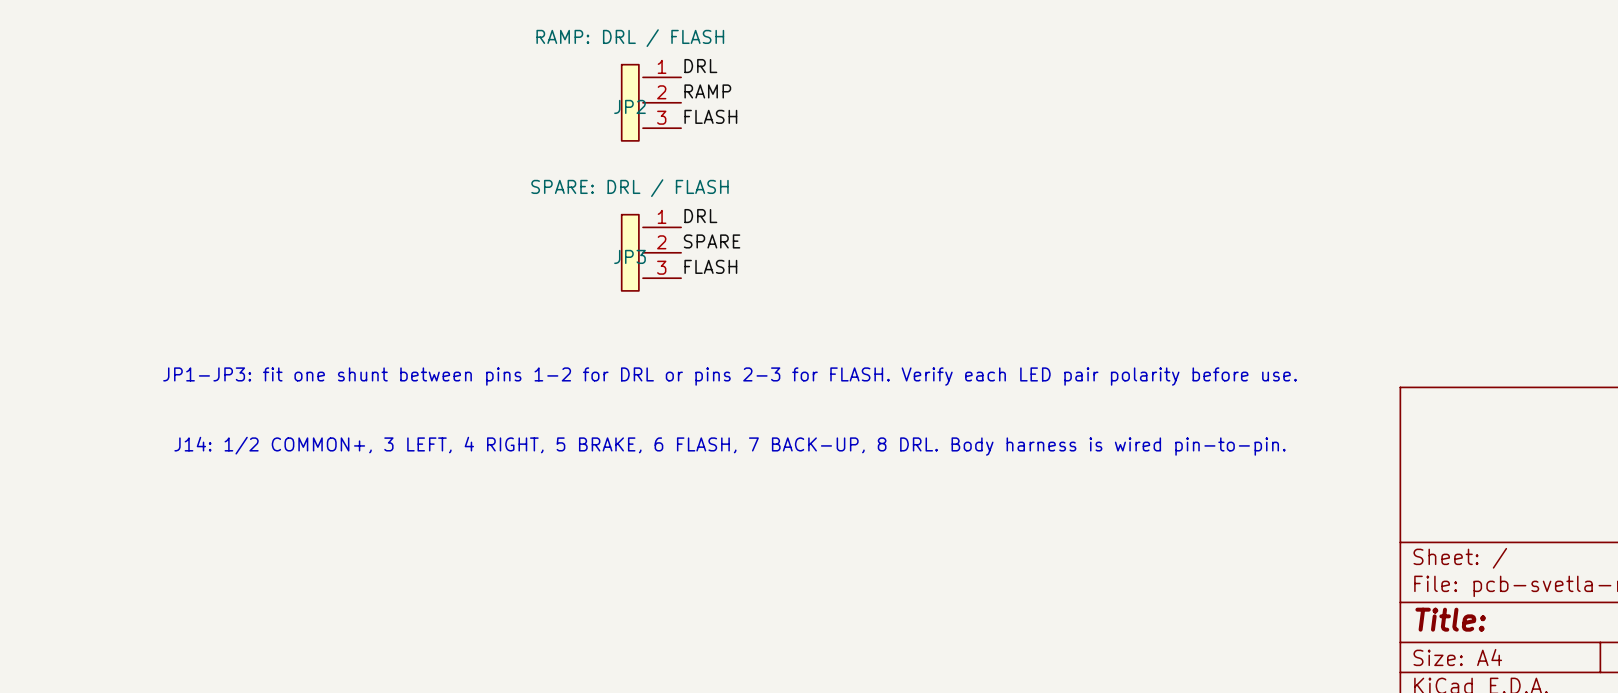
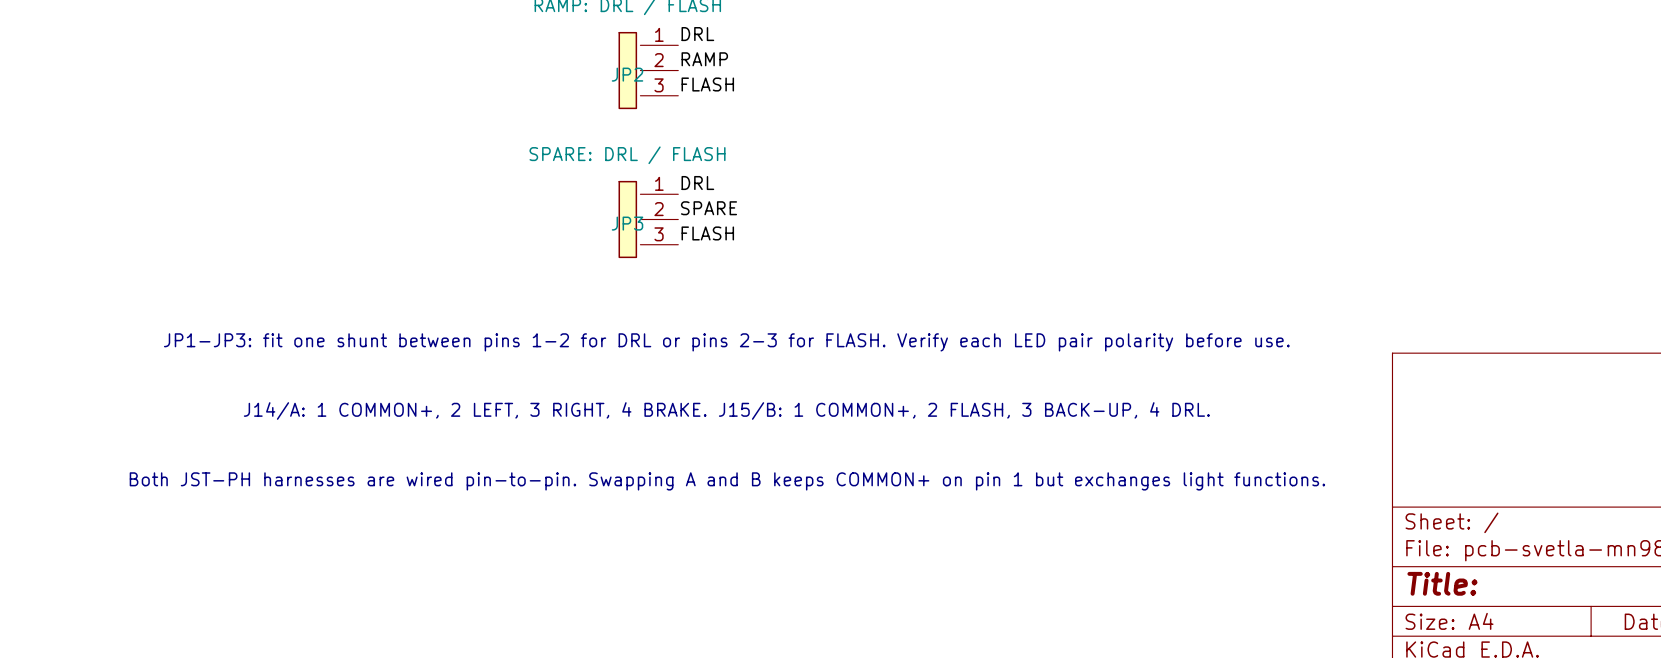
text: J14: 1/2 COMMON+, 3 LEFT, 4 RIGHT, 5 BRAKE, 6 FLASH, 7 BACK-UP, 8 DRL. Body harness is wired pin-to-pin. (730, 446) -> J14/A: 1 COMMON+, 2 LEFT, 3 RIGHT, 4 BRAKE. J15/B: 1 COMMON+, 2 FLASH, 3 BACK-UP, 4 DRL. (726, 411)
text: none -> Both JST-PH harnesses are wired pin-to-pin. Swapping A and B keeps COMMON+ on pin 1 but exchanges light functions. (727, 481)

